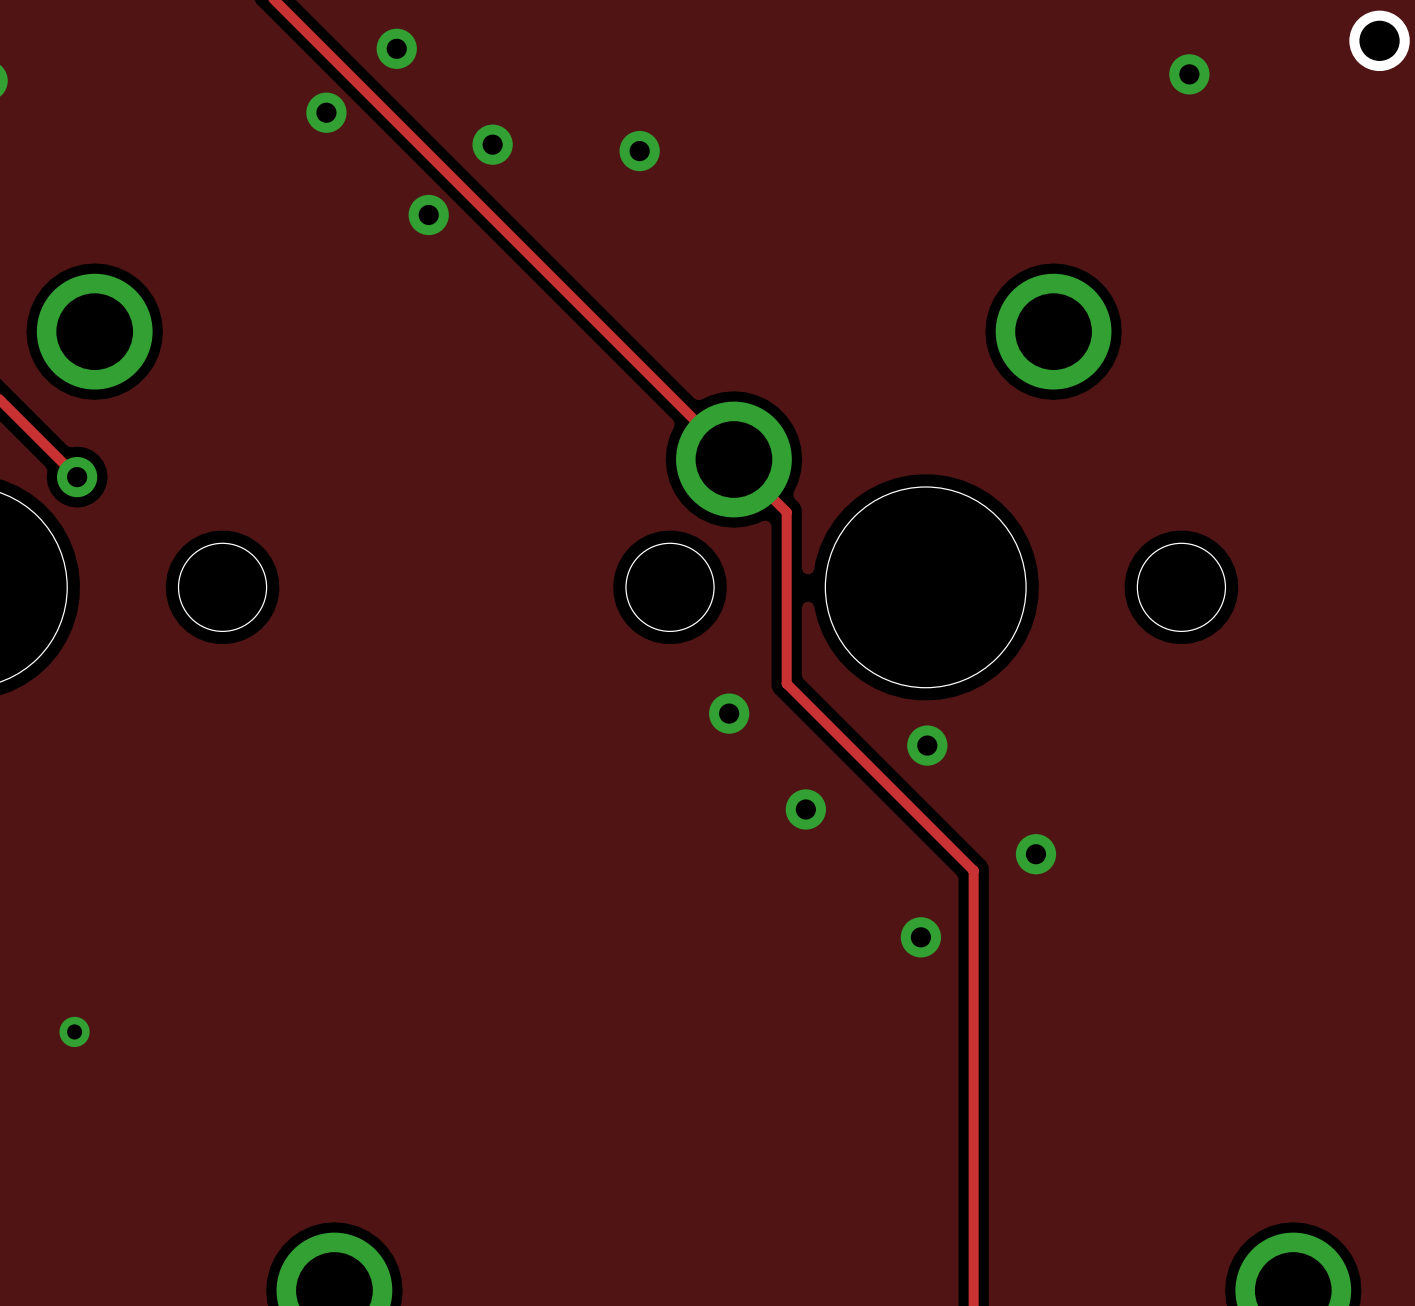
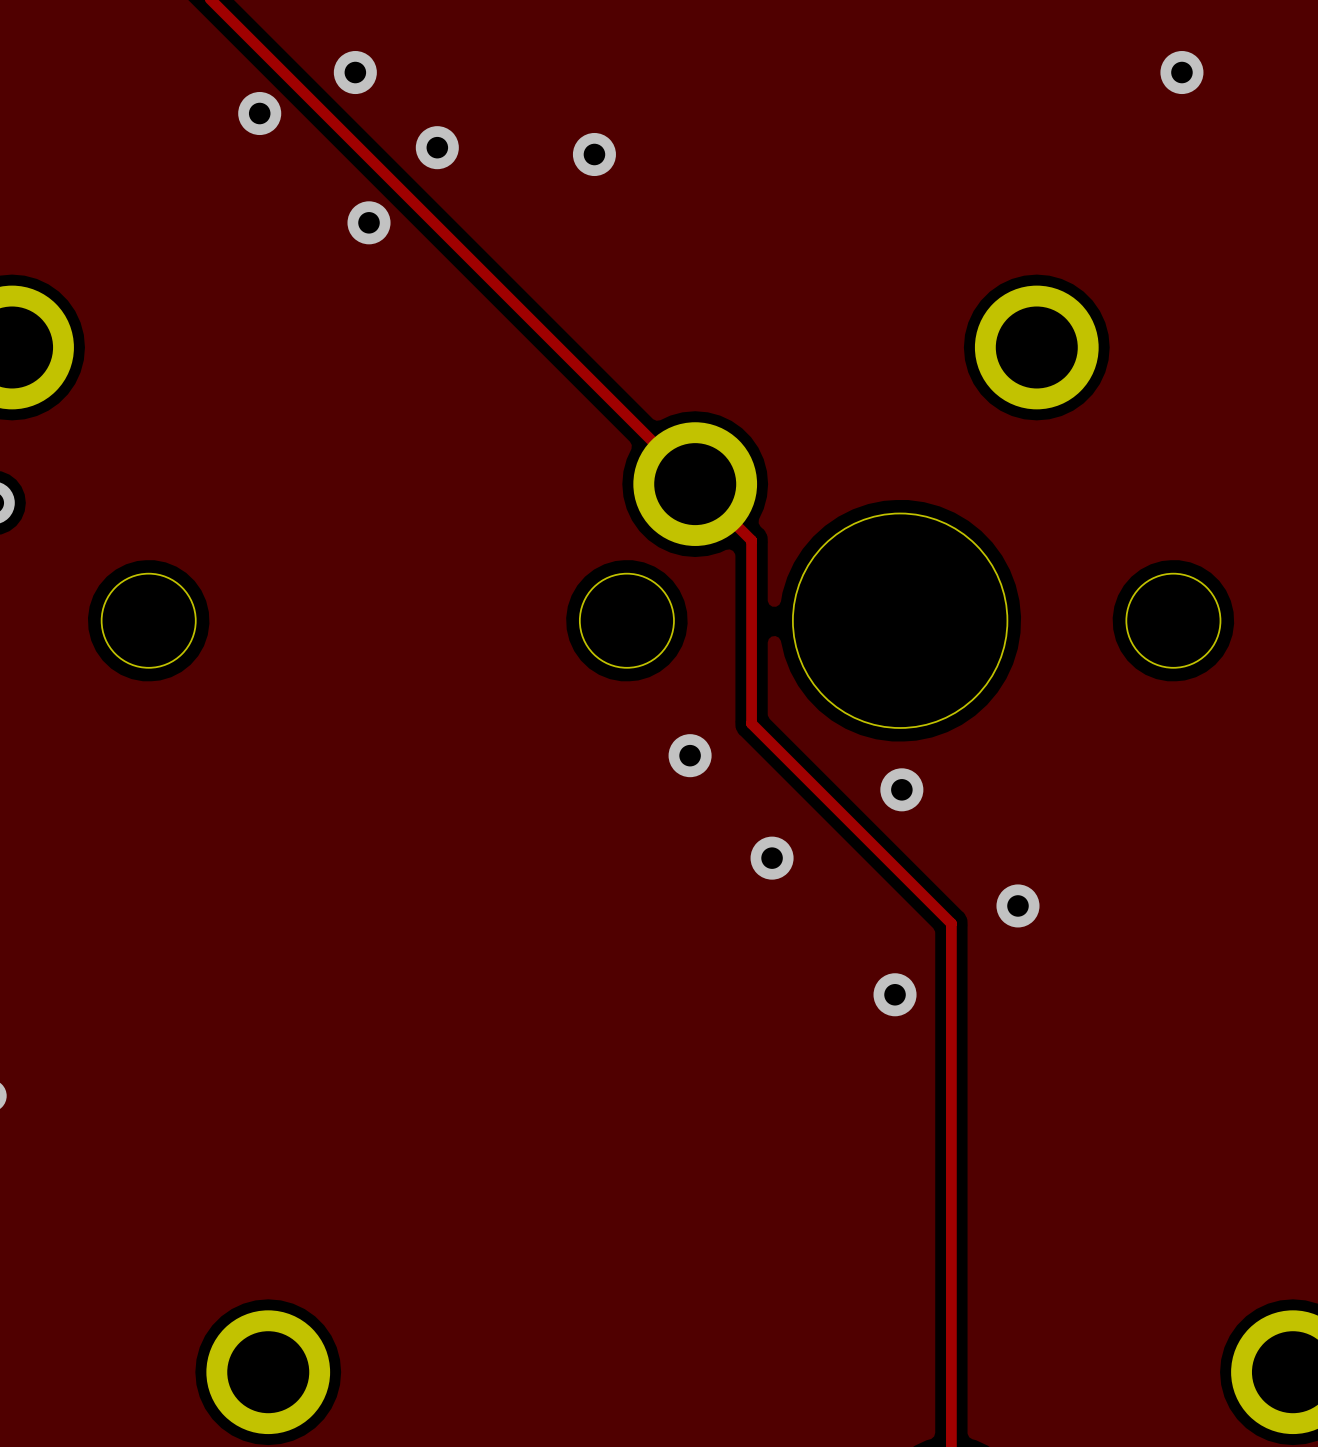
via position: (396, 48) -> (355, 72)

